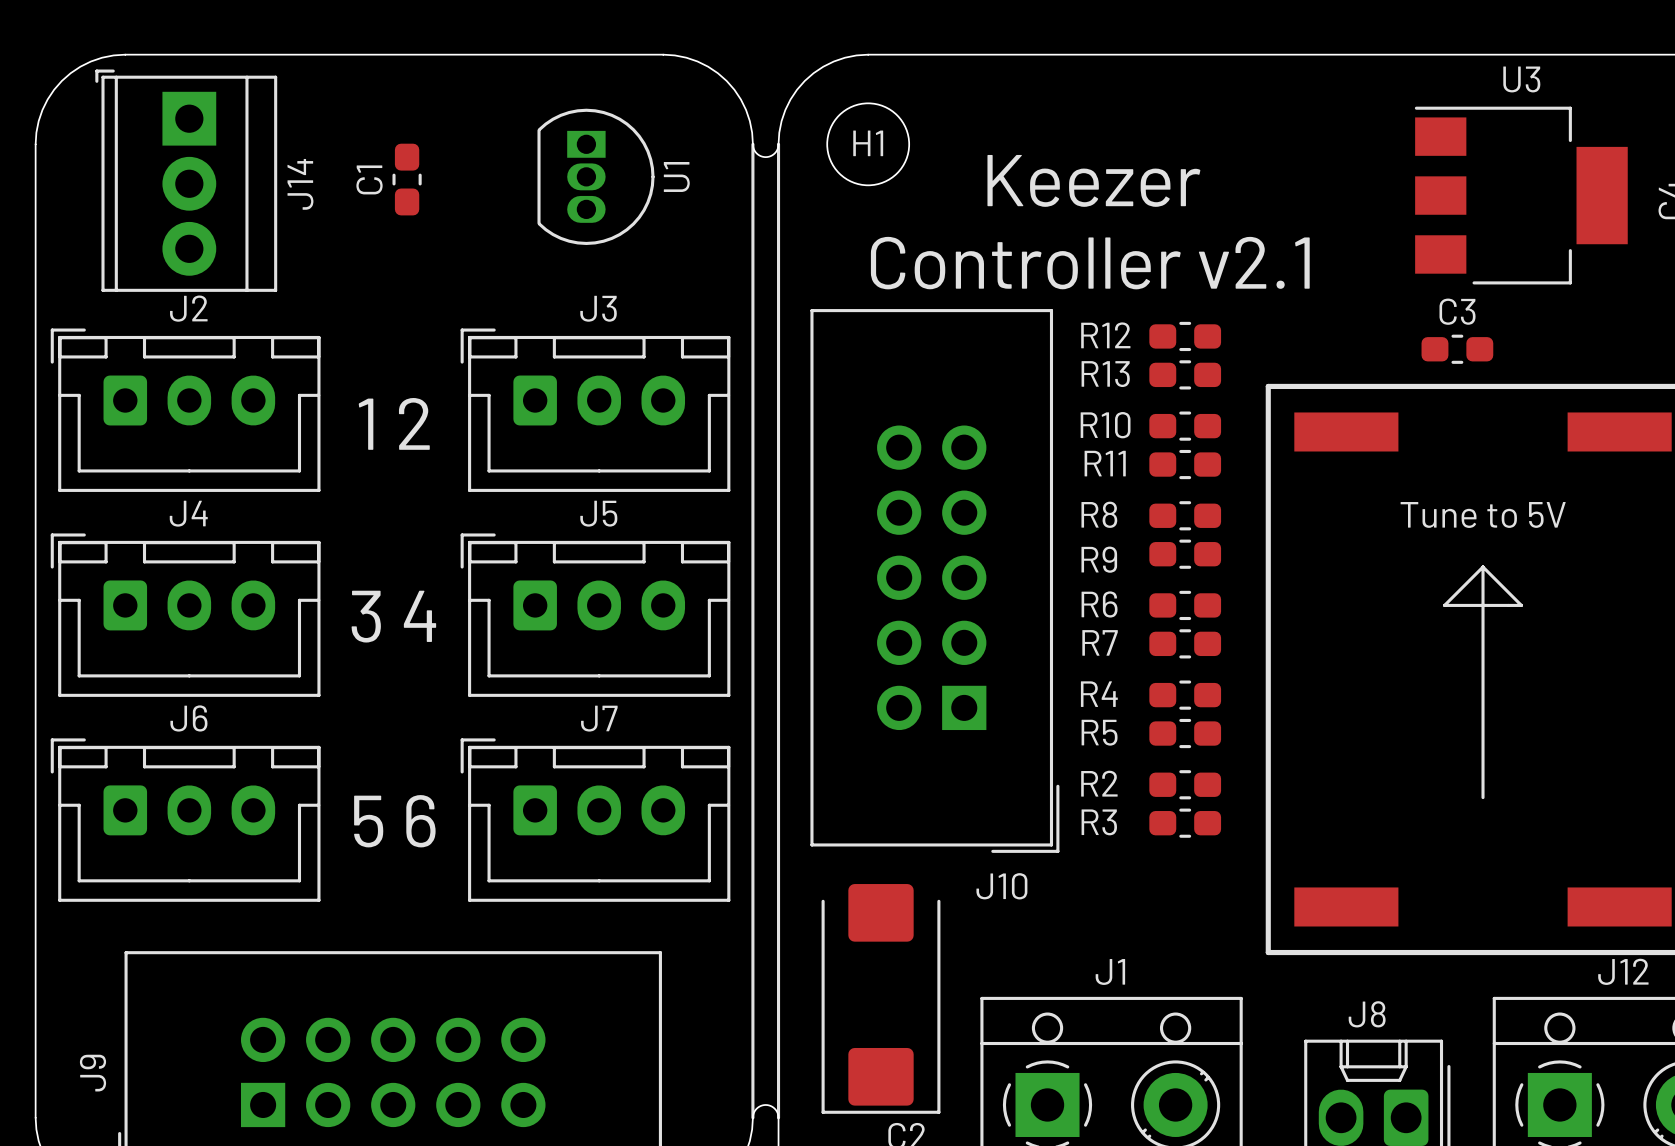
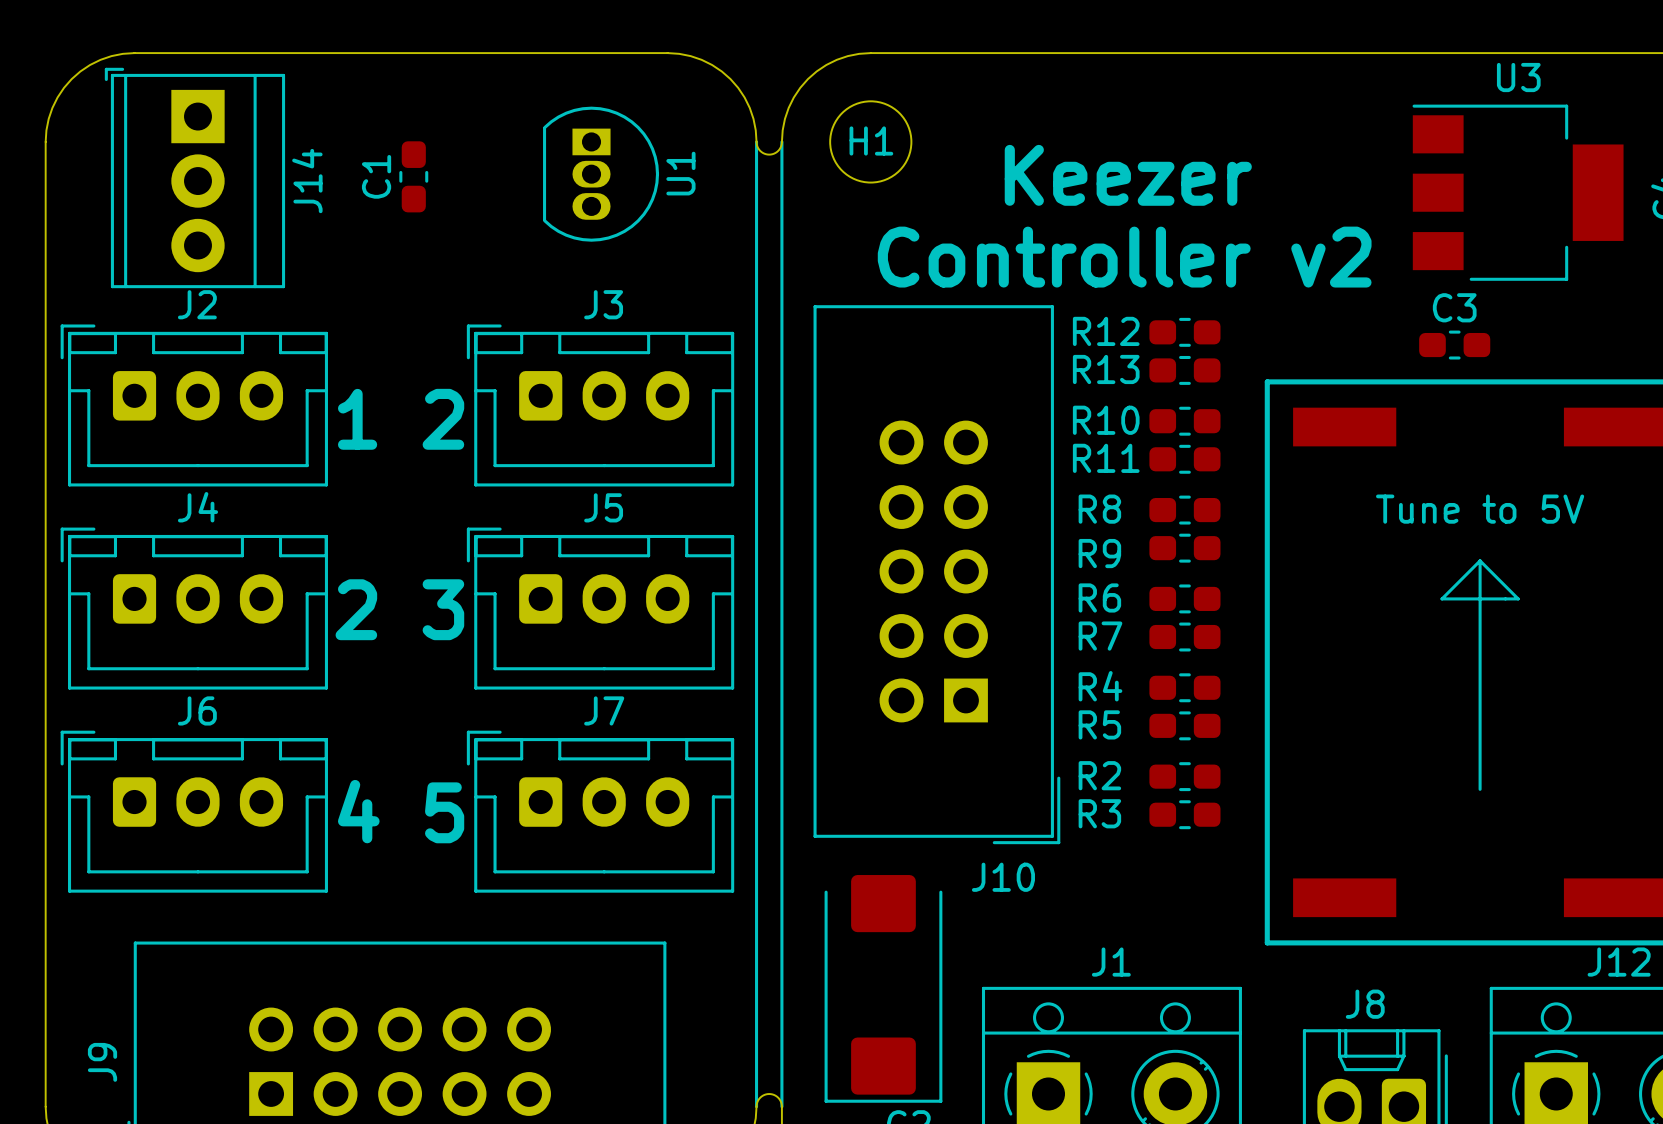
text position: Keezer (1093, 180) -> Keezer (1128, 175)
text: Controller v2.1 (1090, 263) -> Controller v2 (1124, 257)
text: 3 4 (393, 616) -> 2 3 (399, 609)
text: 5 6 (394, 821) -> 4 5 (401, 811)

